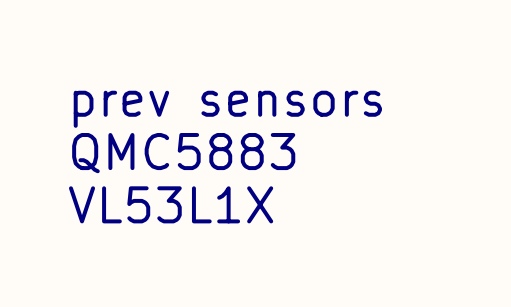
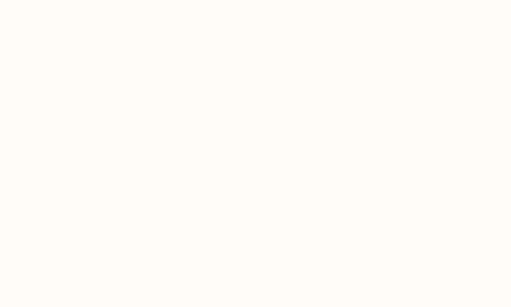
text: prev sensors (227, 109) -> none
text: QMC5883 (183, 153) -> none
text: VL53L1X (171, 204) -> none

